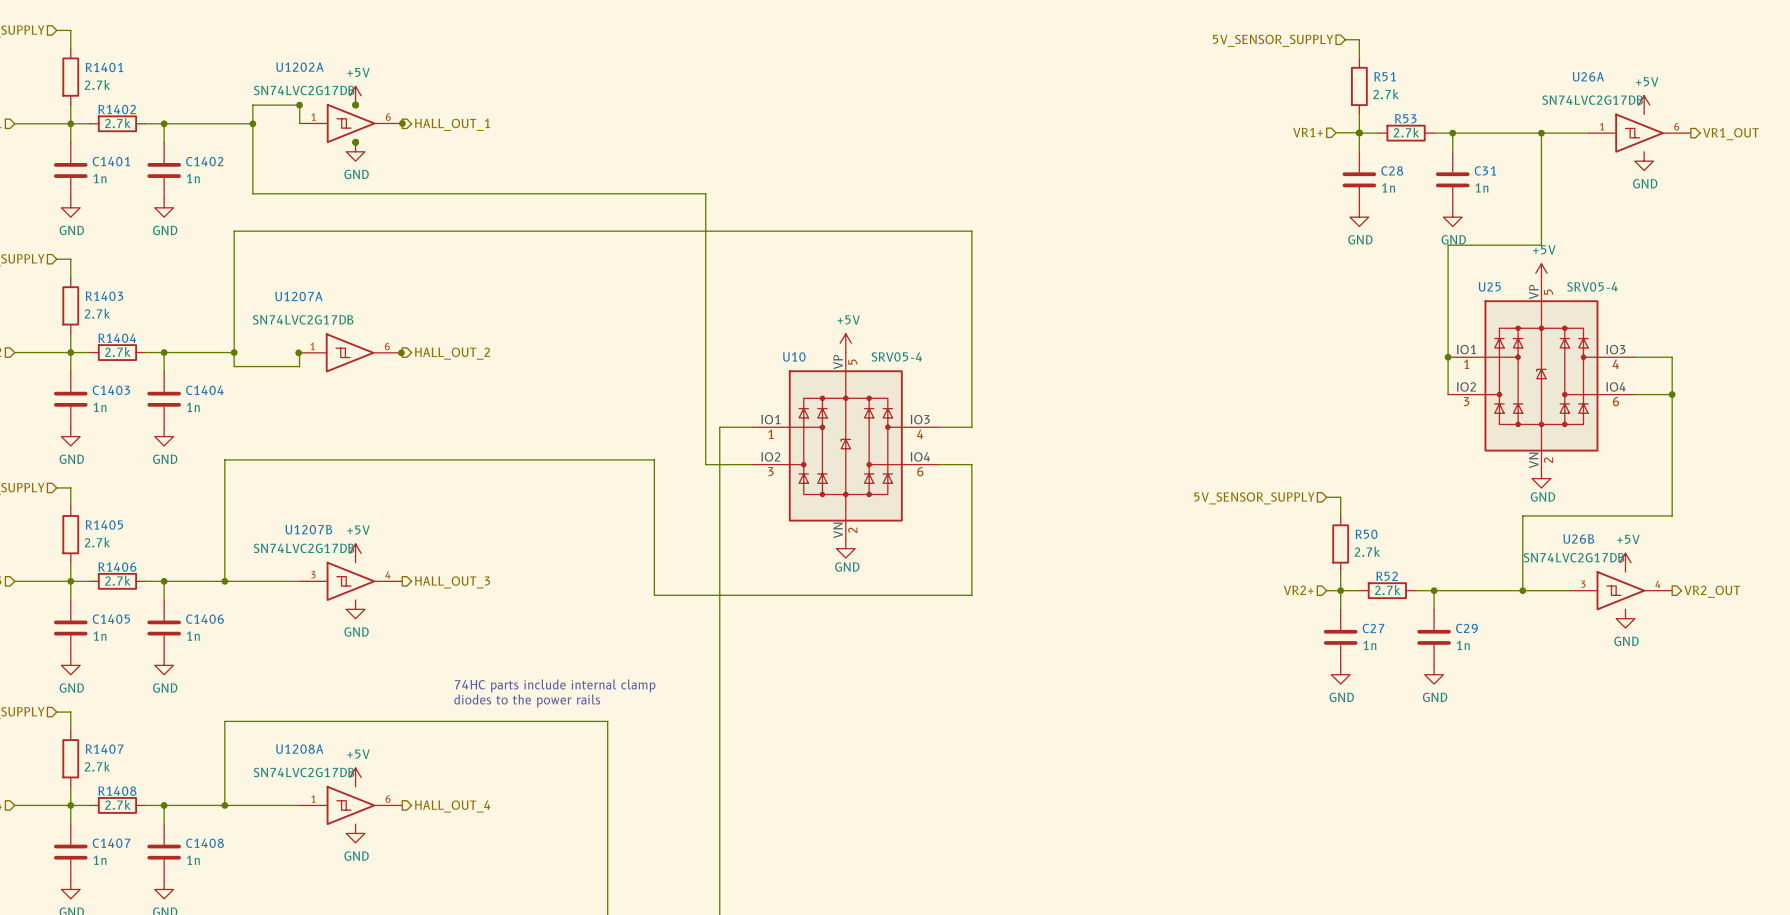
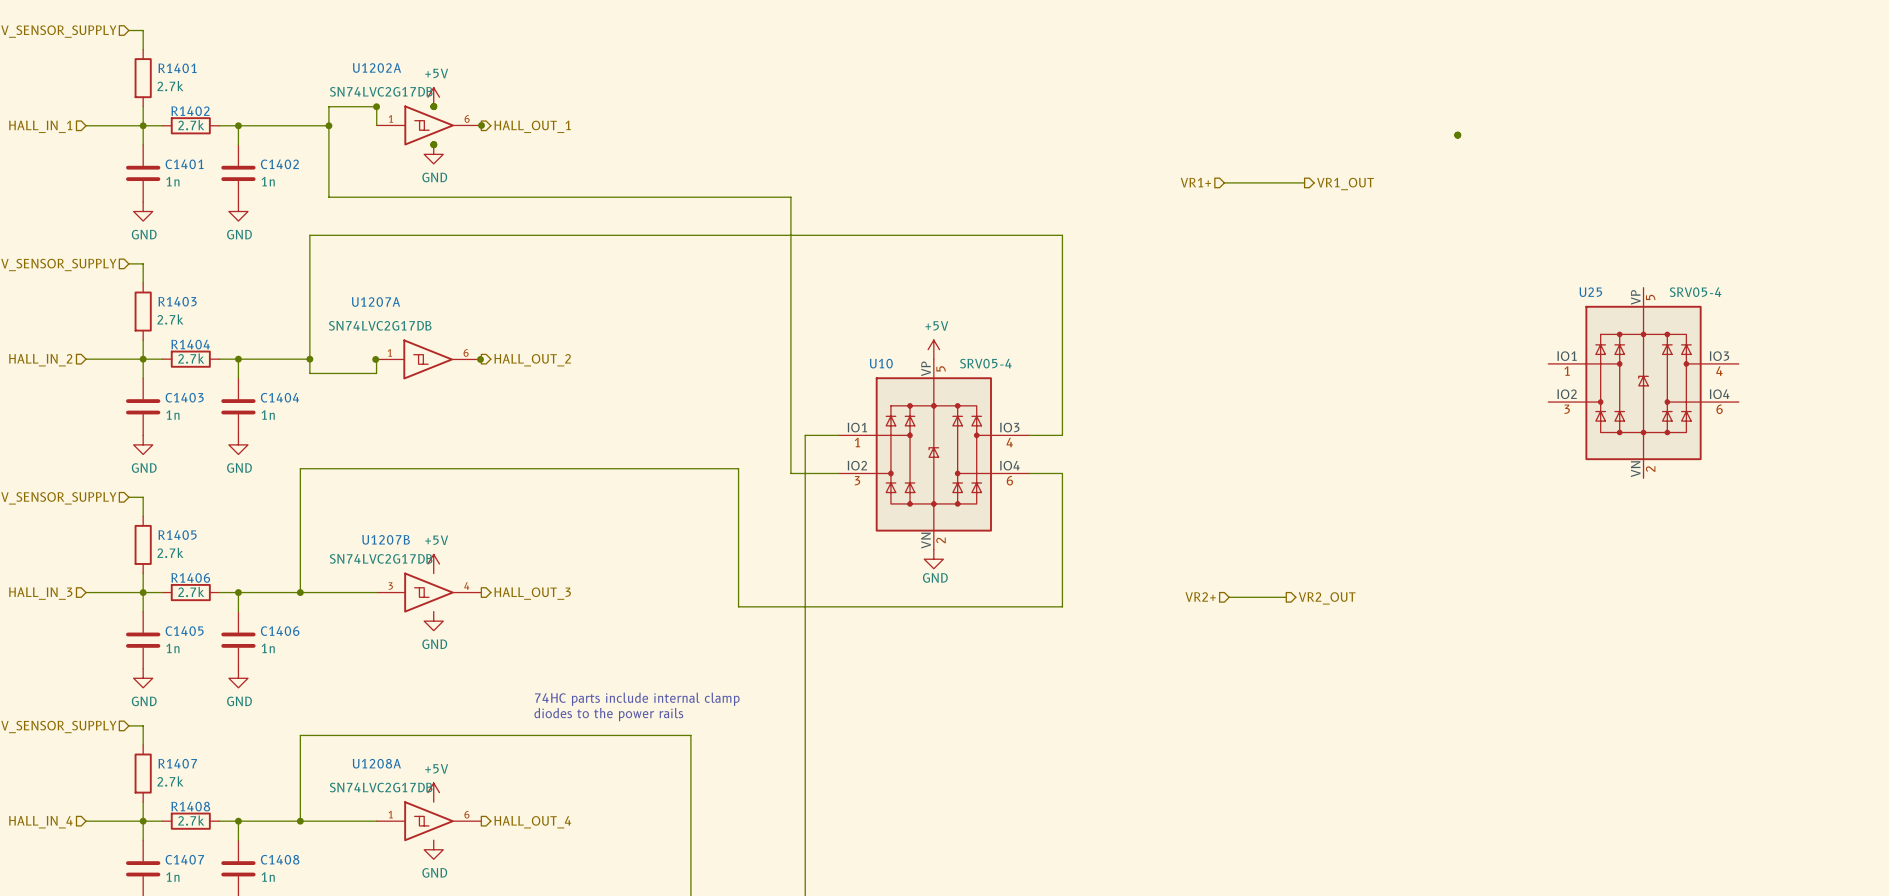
wire: (1345, 39) (1359, 39) (1359, 58) -> none
hierarchical label: 5V_SENSOR_SUPPLY (1273, 40) -> none
R51: 2.7k (1359, 86) -> none
power symbol: +5V (1644, 105) -> none
wire: (1359, 114) (1359, 151) -> none
hierarchical label: VR1+ (1308, 132) -> none
wire: (1336, 132) (1359, 132) -> none
wire: (1359, 133) (1378, 133) -> none
R53: 2.7k (1406, 133) -> none
wire: (1434, 133) (1588, 133) -> none
wire: (1452, 133) (1452, 151) -> none
junction: (1452, 133) -> none
wire: (1541, 133) (1541, 245) (1448, 245) (1448, 394) -> none
junction: (1541, 133) -> none
U26A: SN74LVC2G17DB (1639, 133) -> none
hierarchical label: VR1_OUT (1730, 134) -> none
power symbol: GND (1644, 161) -> none
hierarchical label: none -> VR1+ (1195, 182)
wire: none -> (1224, 182) (1304, 182)
C28: 1n (1359, 179) -> none
C31: 1n (1452, 179) -> none
hierarchical label: none -> VR1_OUT (1345, 184)
power symbol: GND (1359, 217) -> none
power symbol: GND (1452, 217) -> none
power symbol: +5V (1541, 273) -> none
junction: (1448, 357) -> none
wire: (1634, 357) (1672, 357) (1672, 515) (1522, 515) (1522, 590) -> none
wire: (1634, 394) (1672, 394) -> none
junction: (1672, 394) -> none
power symbol: GND (1541, 478) -> none
wire: (1326, 497) (1340, 497) (1340, 515) -> none
hierarchical label: 5V_SENSOR_SUPPLY (1254, 498) -> none
R50: 2.7k (1340, 543) -> none
power symbol: +5V (1625, 562) -> none
wire: (1340, 572) (1340, 609) -> none
hierarchical label: none -> VR2+ (1200, 597)
wire: none -> (1229, 597) (1286, 597)
hierarchical label: none -> VR2_OUT (1327, 598)
hierarchical label: VR2+ (1298, 590) -> none
wire: (1326, 590) (1359, 590) -> none
junction: (1340, 590) -> none
R52: 2.7k (1387, 590) -> none
wire: (1415, 590) (1569, 590) -> none
wire: (1434, 590) (1434, 609) -> none
junction: (1434, 590) -> none
junction: (1522, 590) -> none
U26B: SN74LVC2G17DB (1620, 590) -> none
hierarchical label: VR2_OUT (1712, 591) -> none
power symbol: GND (1625, 618) -> none
C27: 1n (1340, 637) -> none
C29: 1n (1434, 637) -> none
power symbol: GND (1340, 674) -> none
power symbol: GND (1434, 674) -> none

